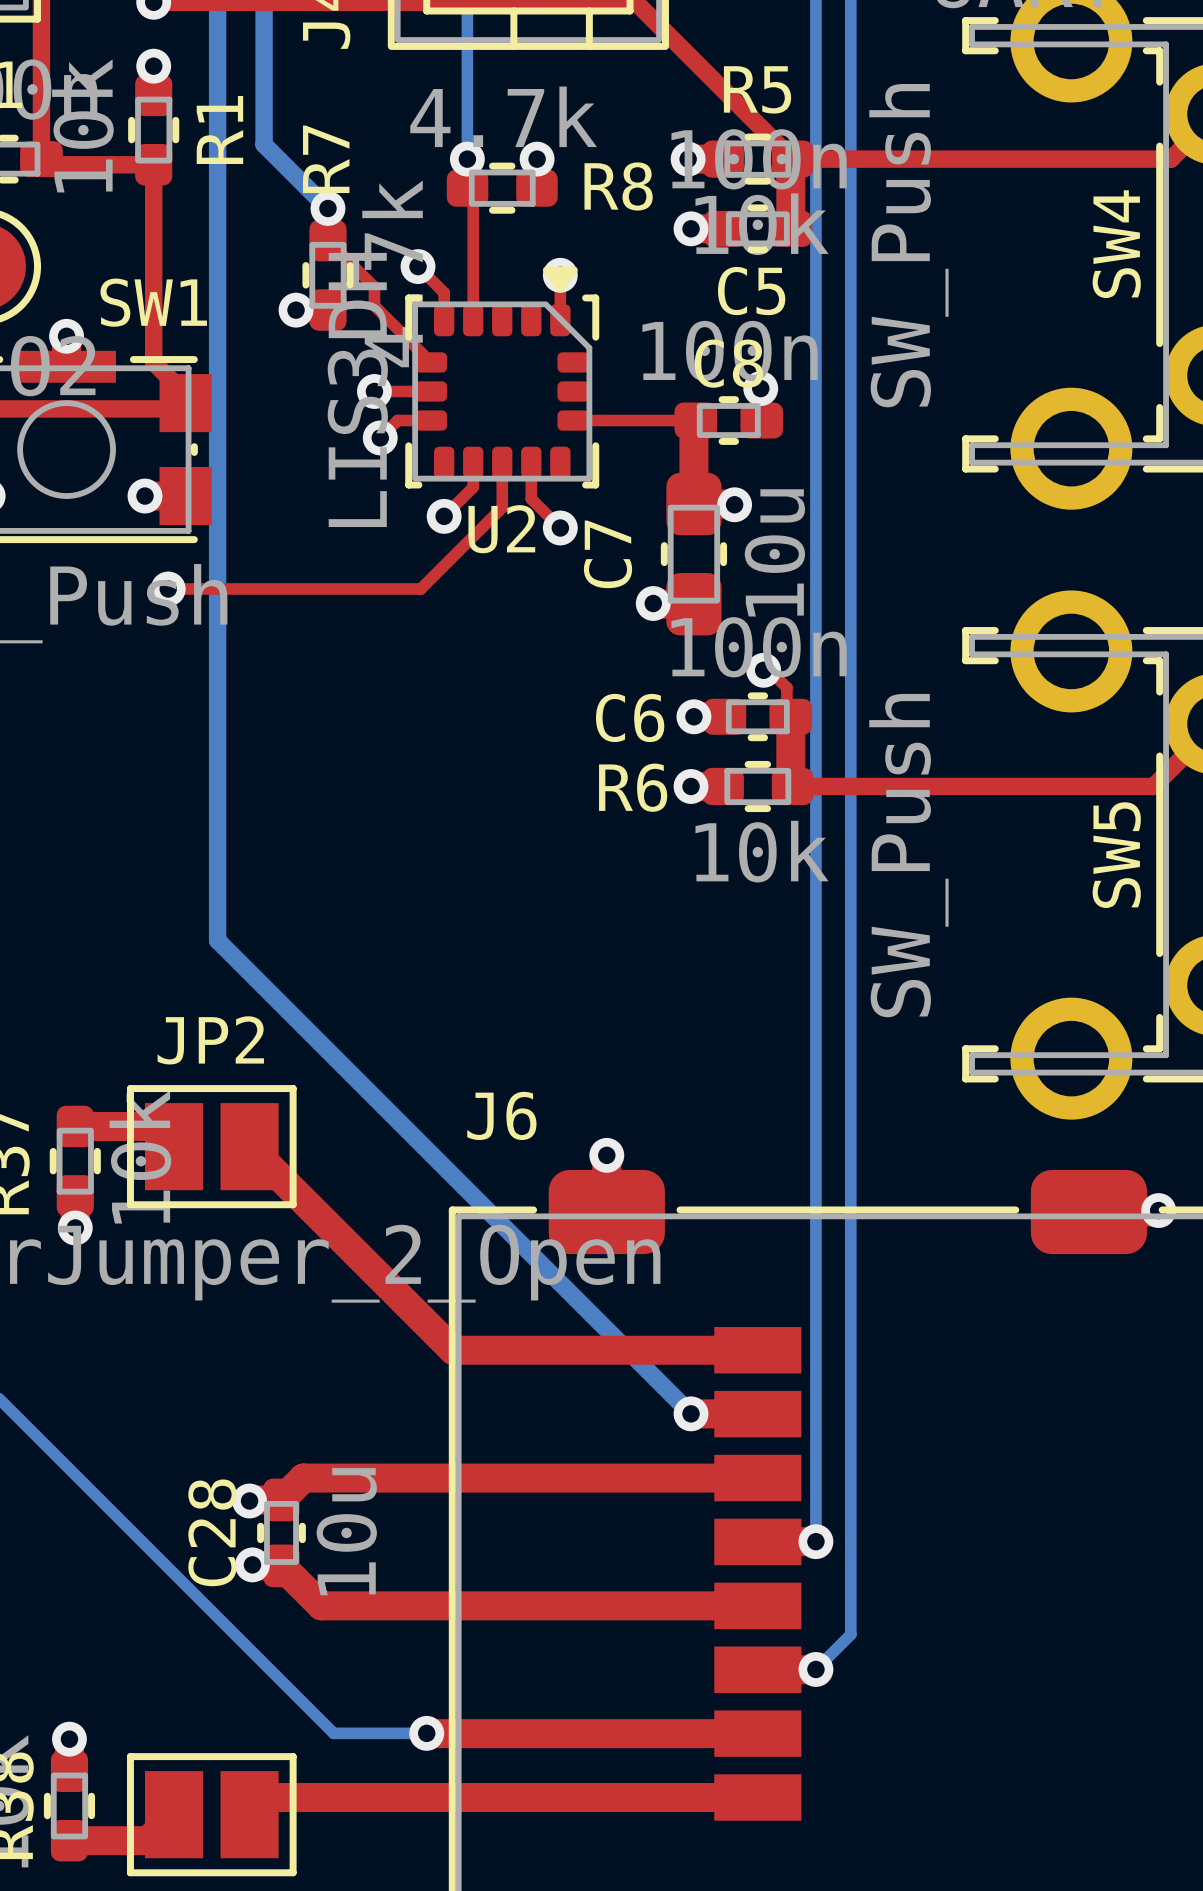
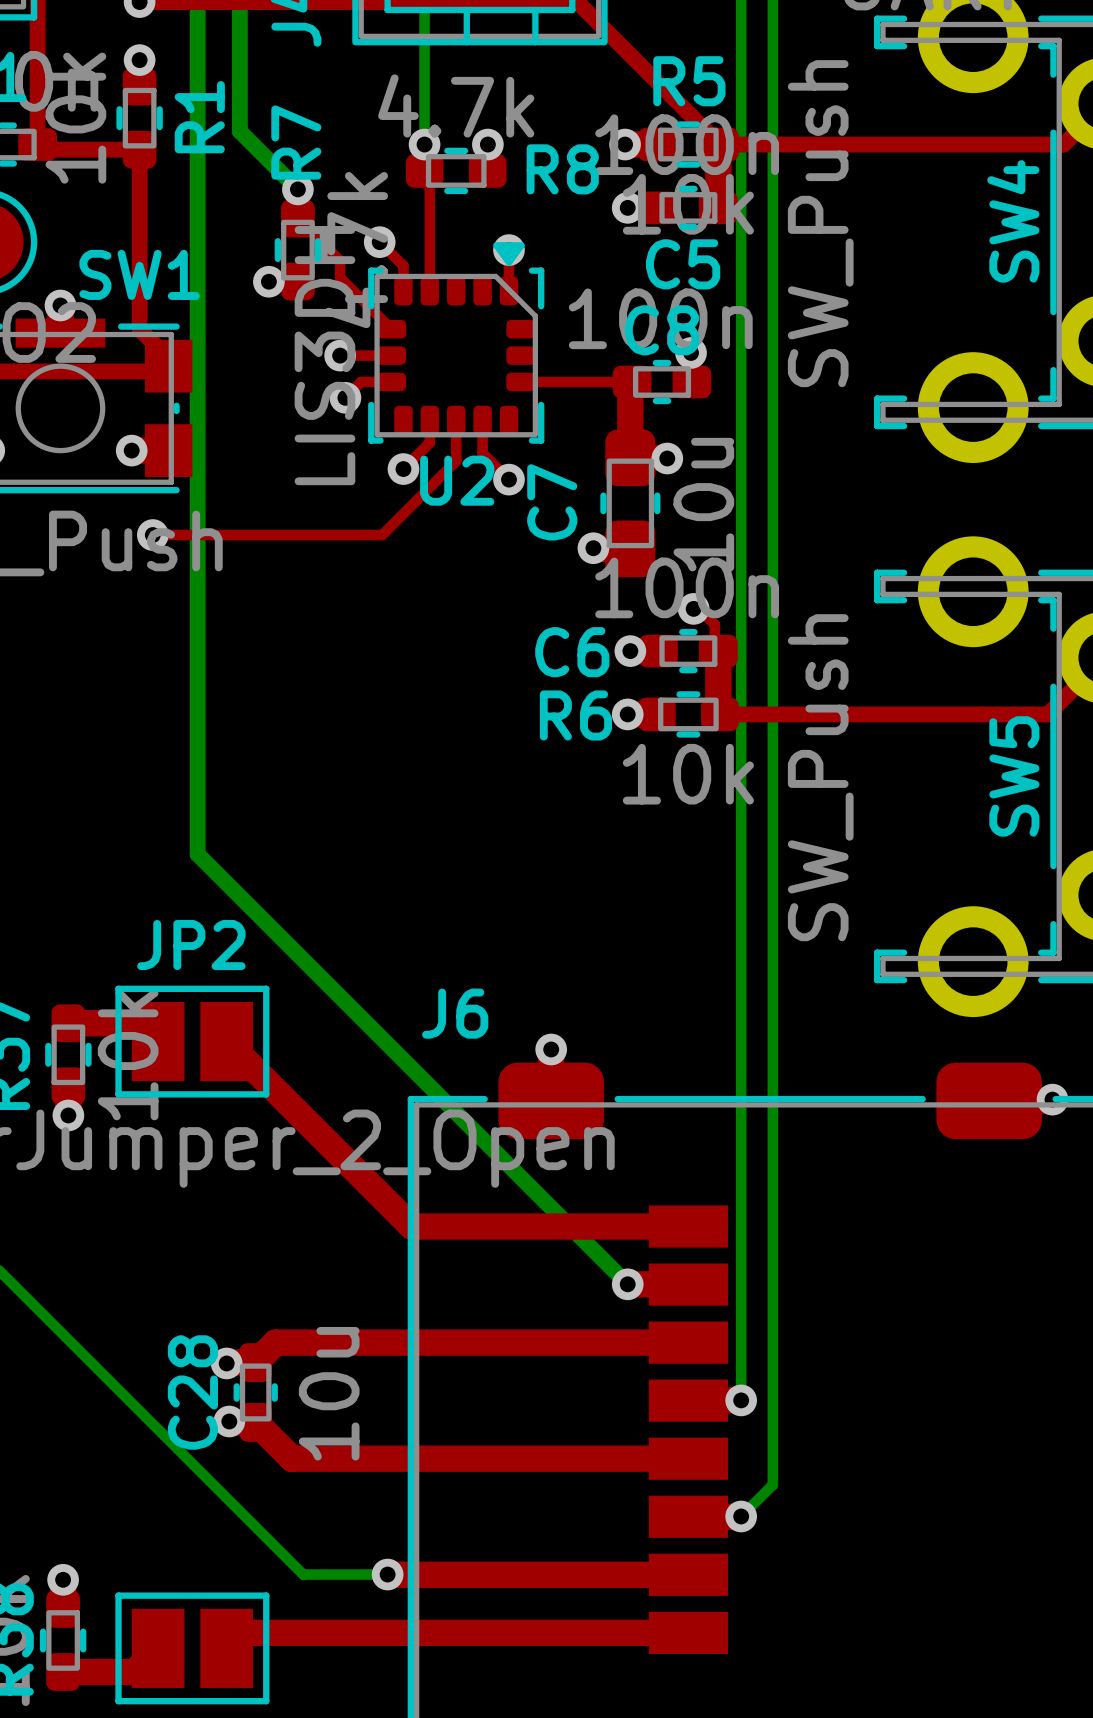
C28 value position: 10u (346, 1531) -> 10u (329, 1393)

